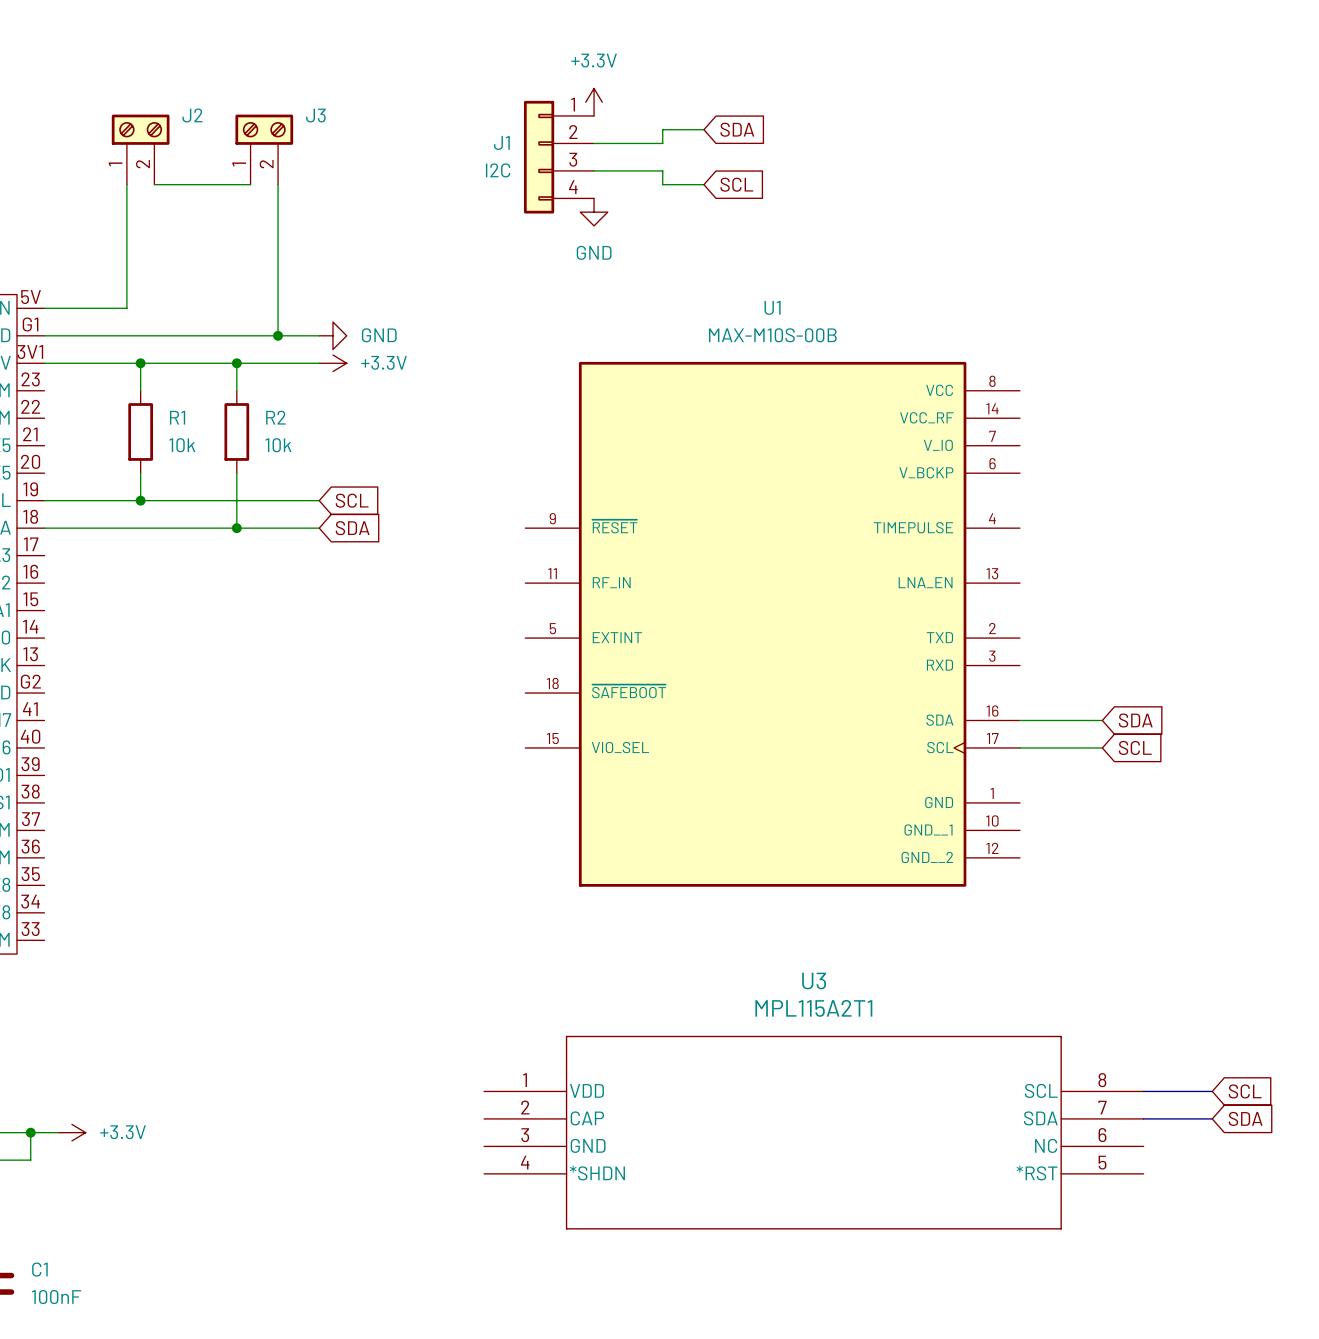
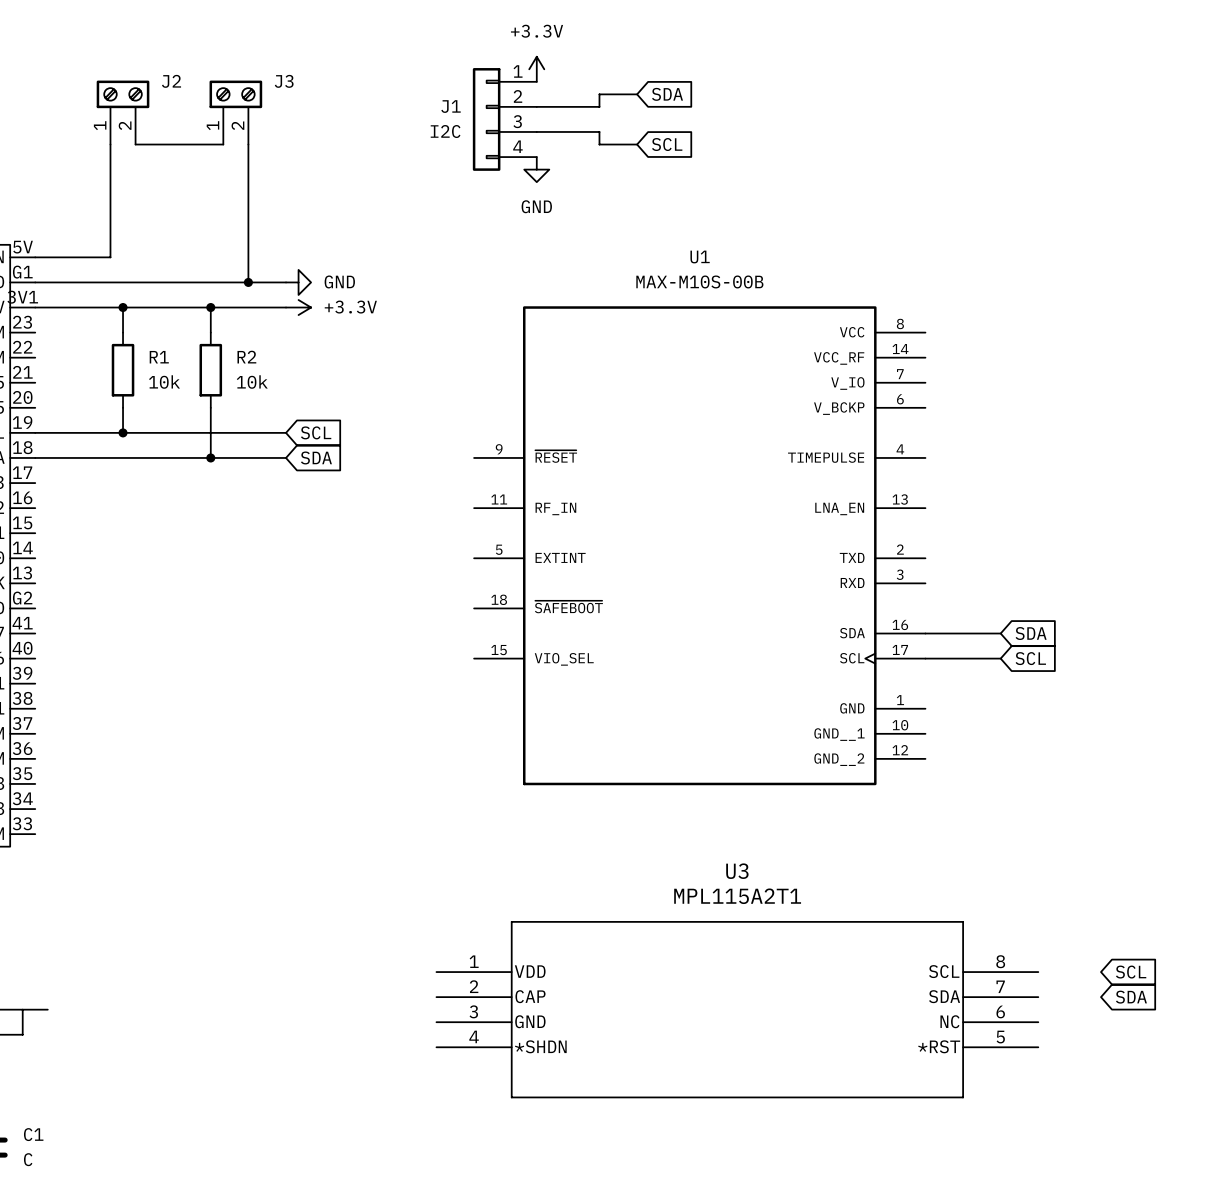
bus: (1143, 1091) (1212, 1091) -> none
bus: (1143, 1118) (1212, 1118) -> none
junction: (30, 1132) -> none
power symbol: +3.3V (71, 1132) -> none
C1 value: 100nF (56, 1297) -> C (28, 1159)

